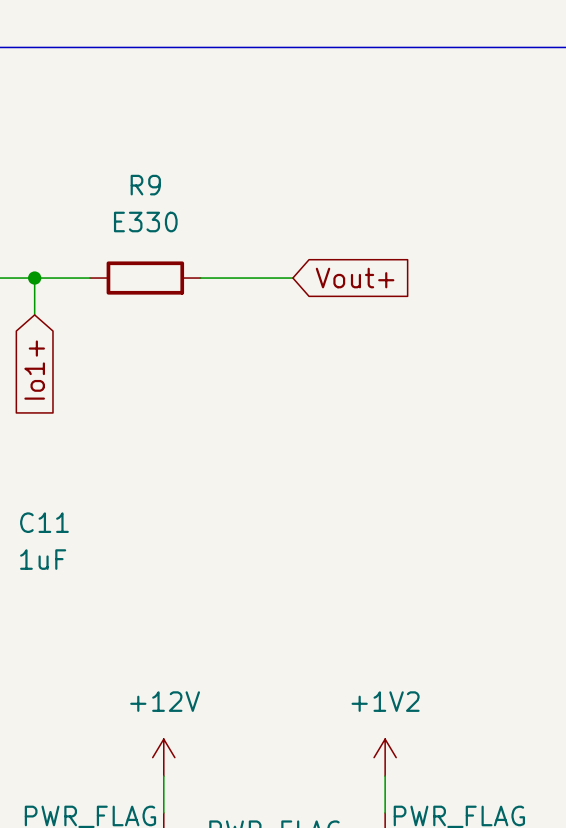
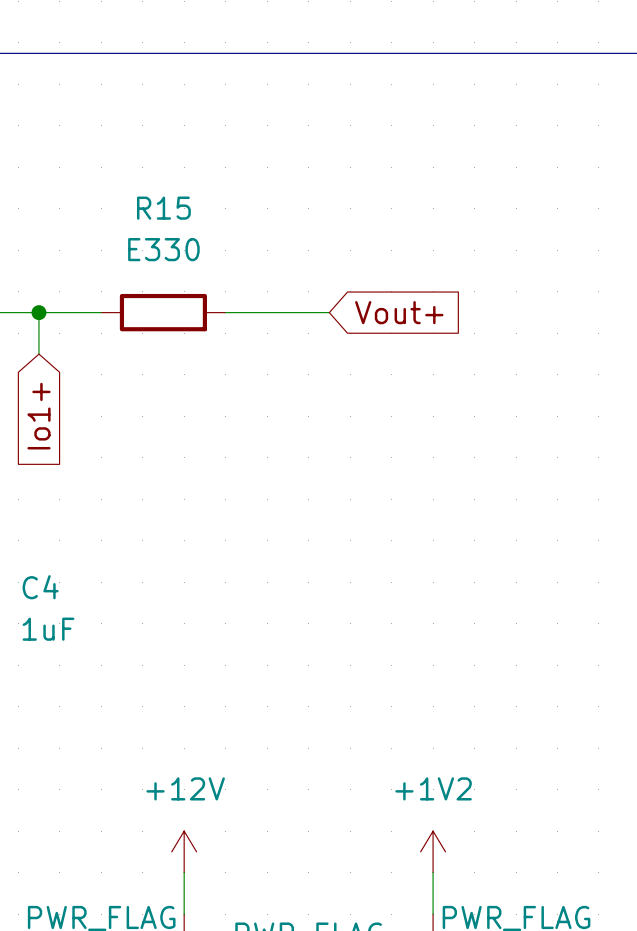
R9 name: R9 (145, 185) -> R15 (163, 208)
C11 name: C11 (44, 522) -> C4 (40, 587)

